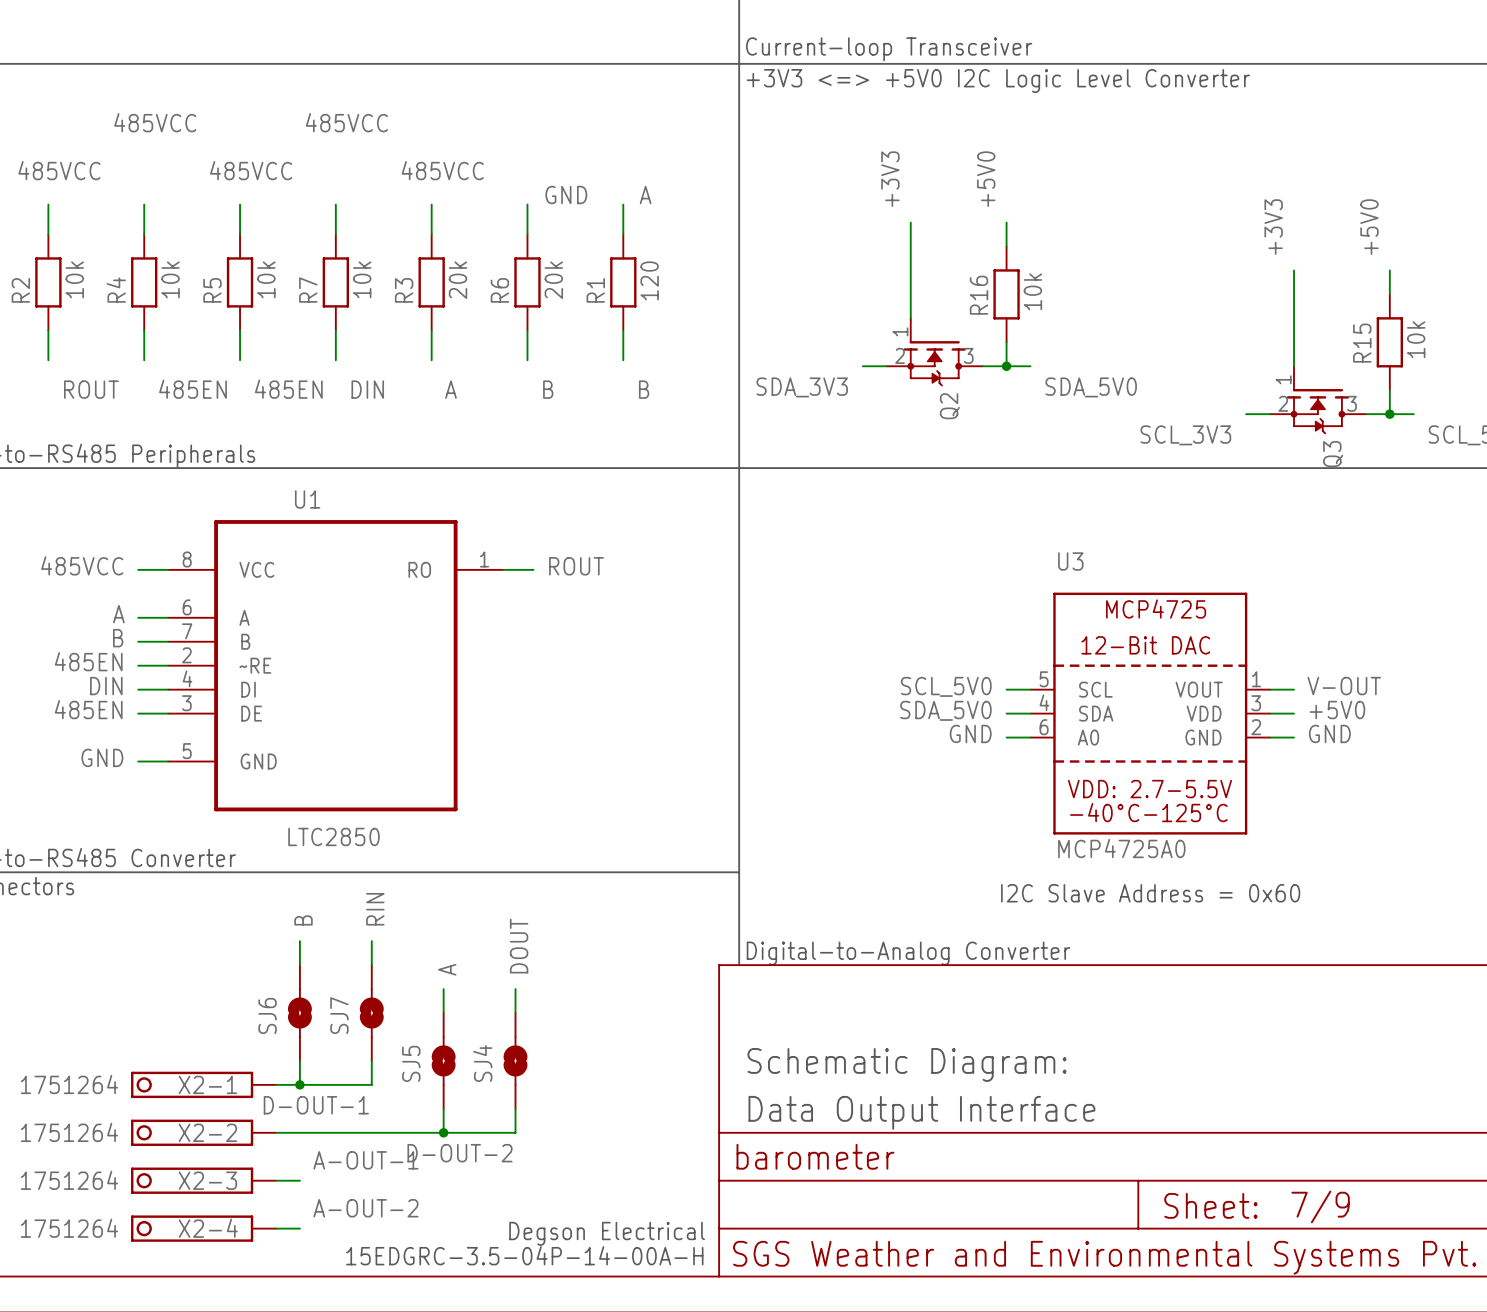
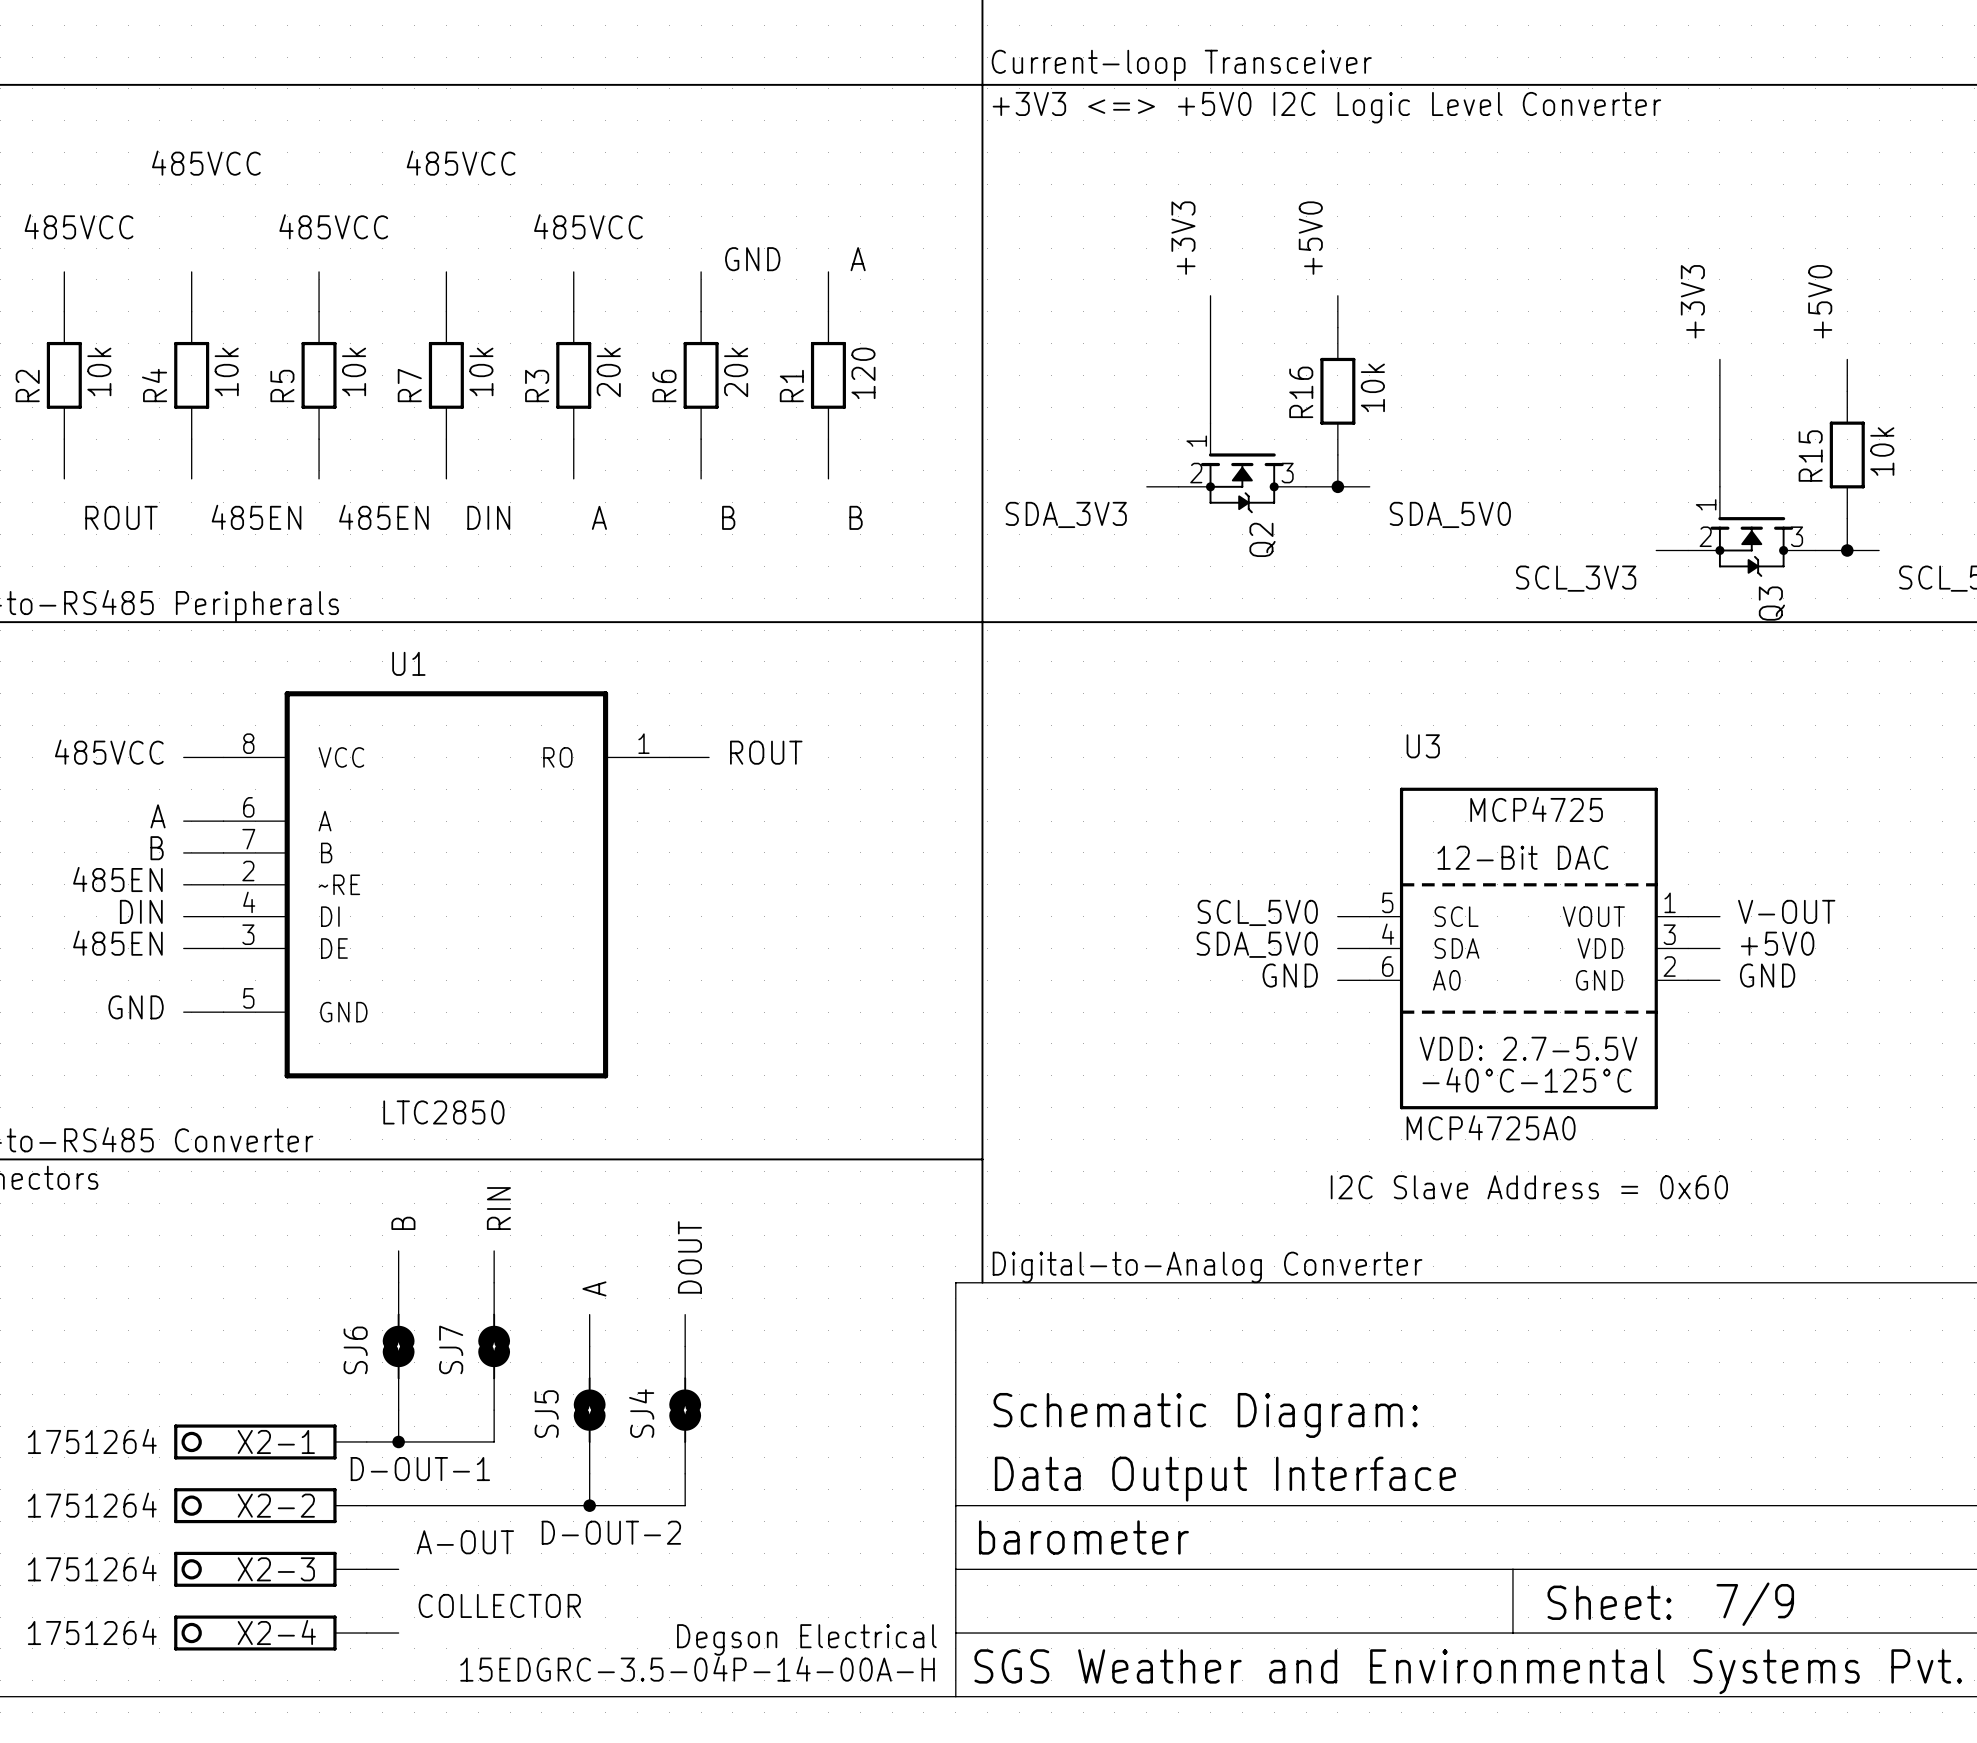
label: A-OUT-1 (365, 1160) -> A-OUT (465, 1542)
label: A-OUT-2 (365, 1208) -> COLLECTOR (499, 1605)

